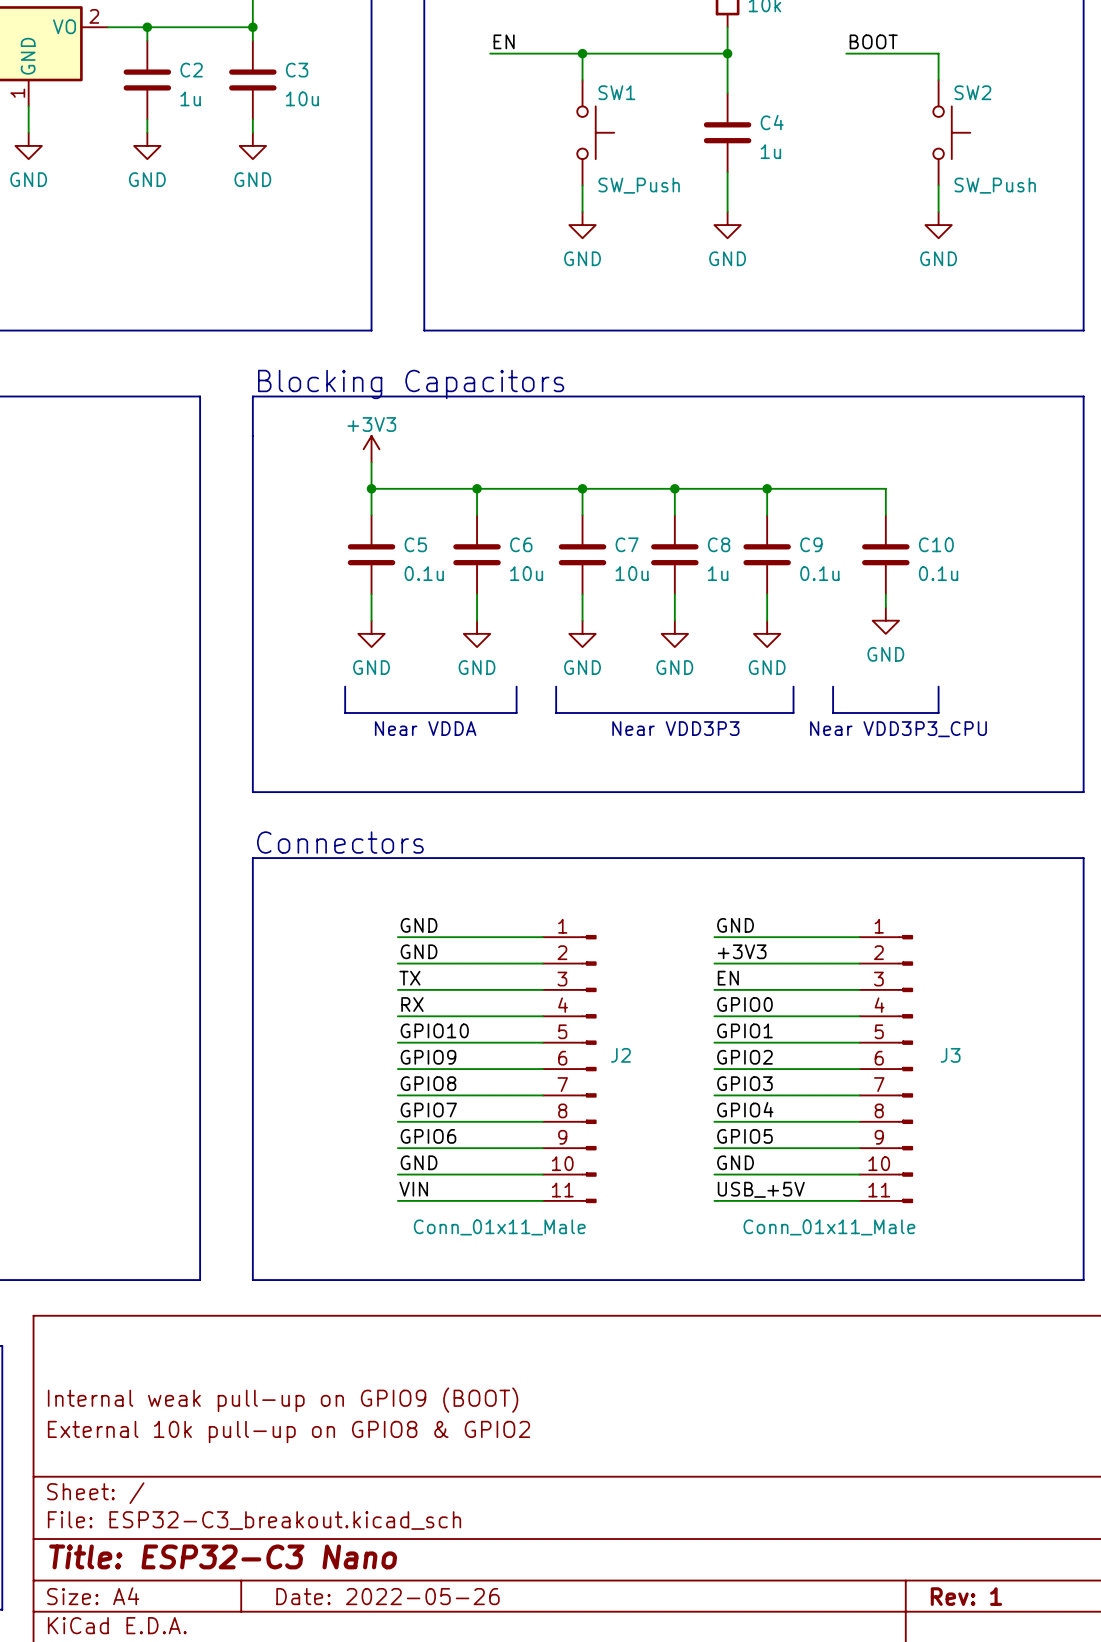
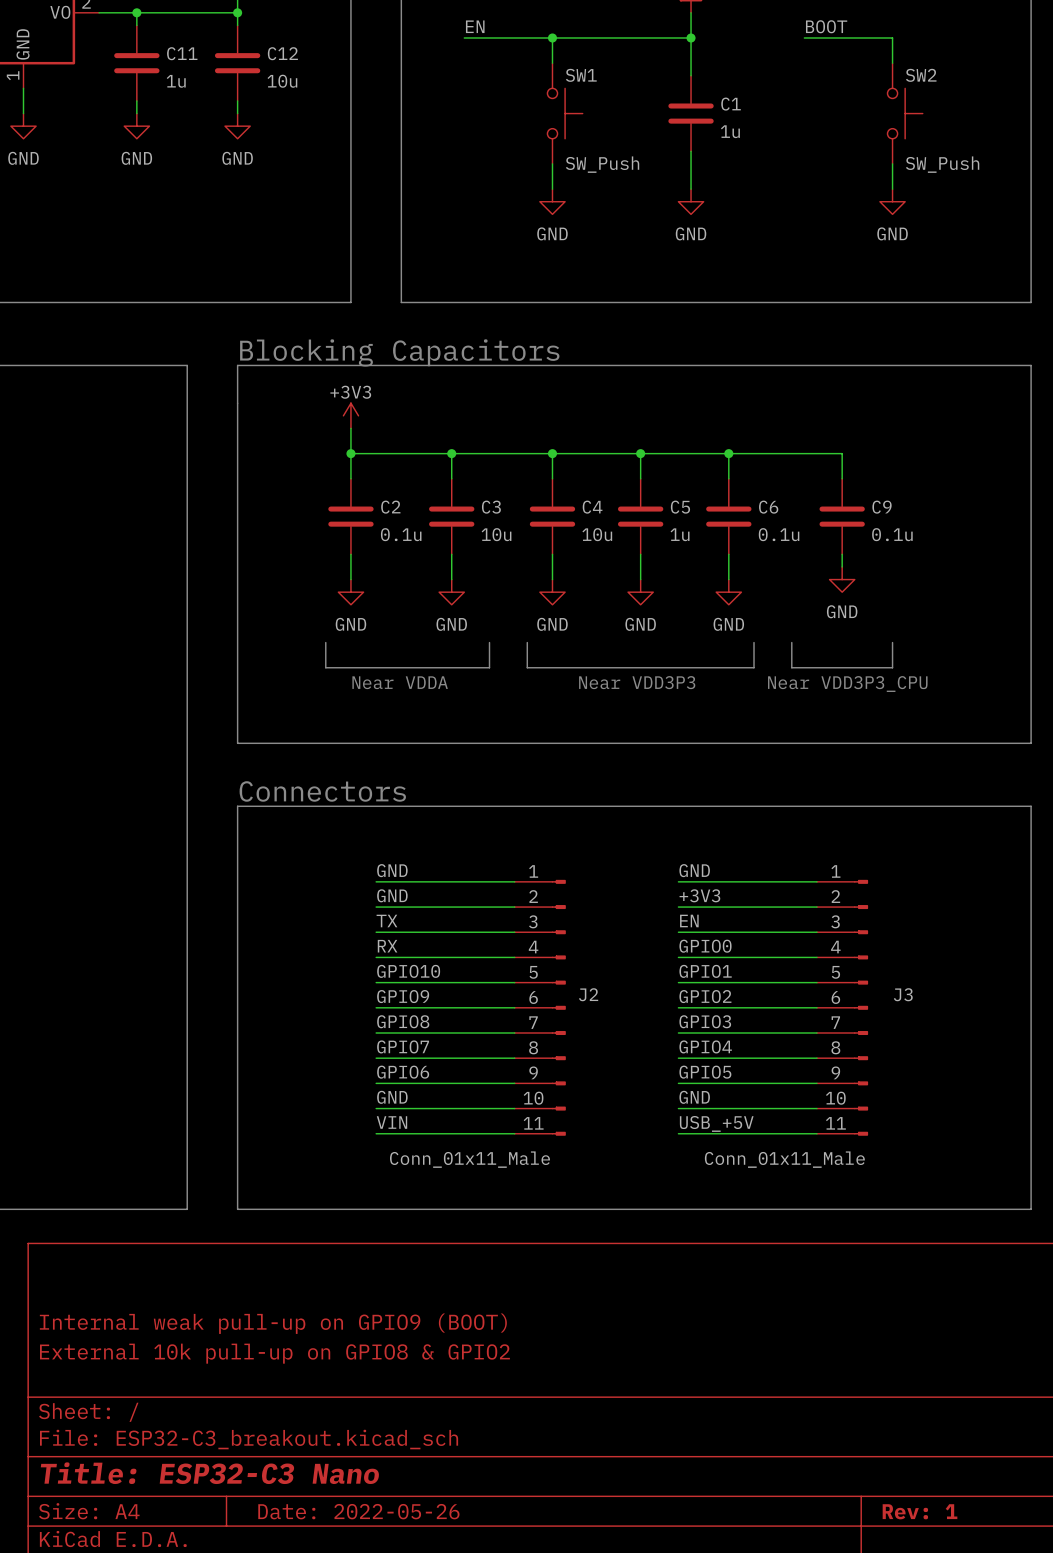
C2 name: C2 (191, 70) -> C11 (182, 53)
C3 name: C3 (297, 70) -> C12 (282, 53)
C4 name: C4 (772, 122) -> C1 (731, 104)
C5 name: C5 (415, 544) -> C2 (390, 507)
C6 name: C6 (521, 544) -> C3 (491, 507)
C7 name: C7 (627, 544) -> C4 (592, 507)
C8 name: C8 (719, 544) -> C5 (680, 507)
C9 name: C9 (811, 544) -> C6 (768, 507)
C10 name: C10 (936, 544) -> C9 (882, 507)

